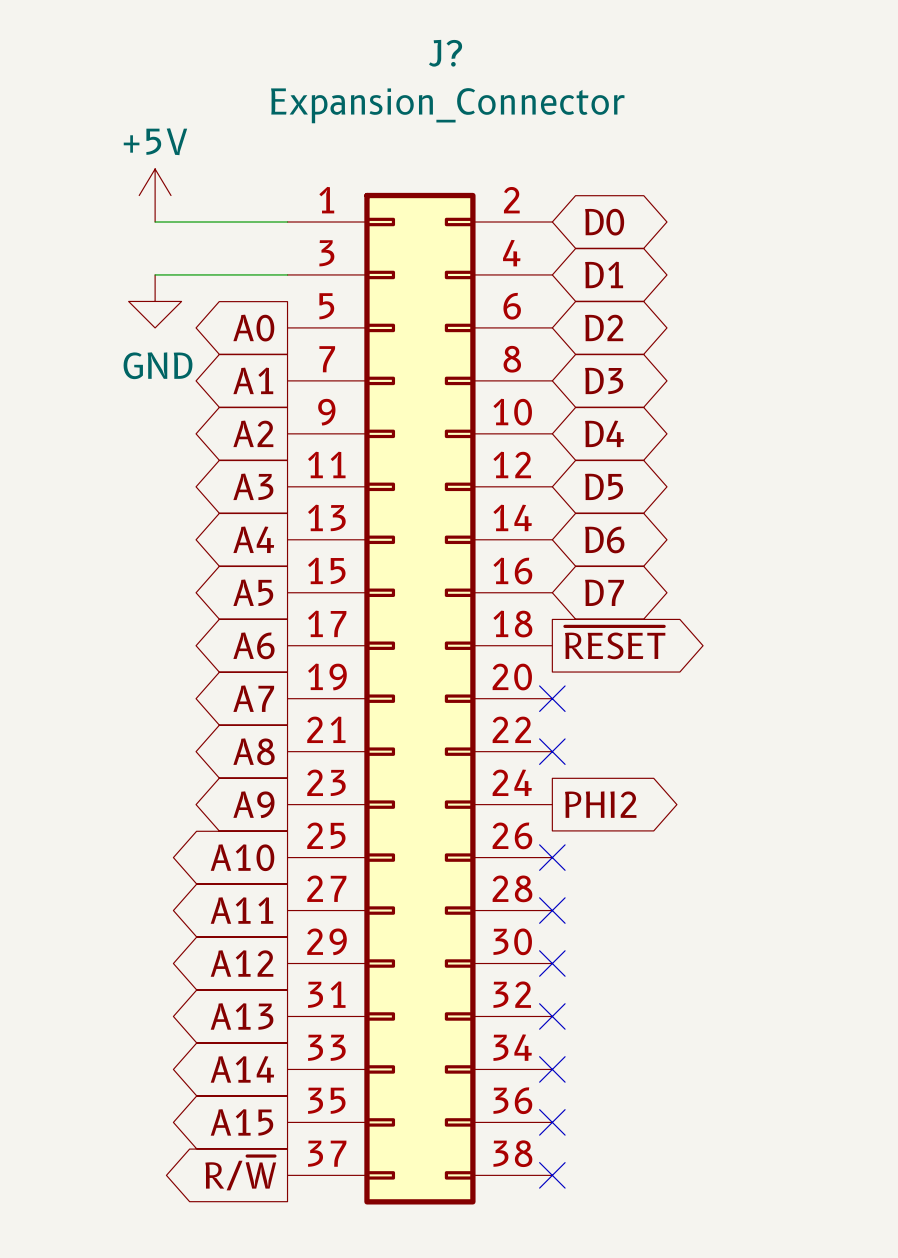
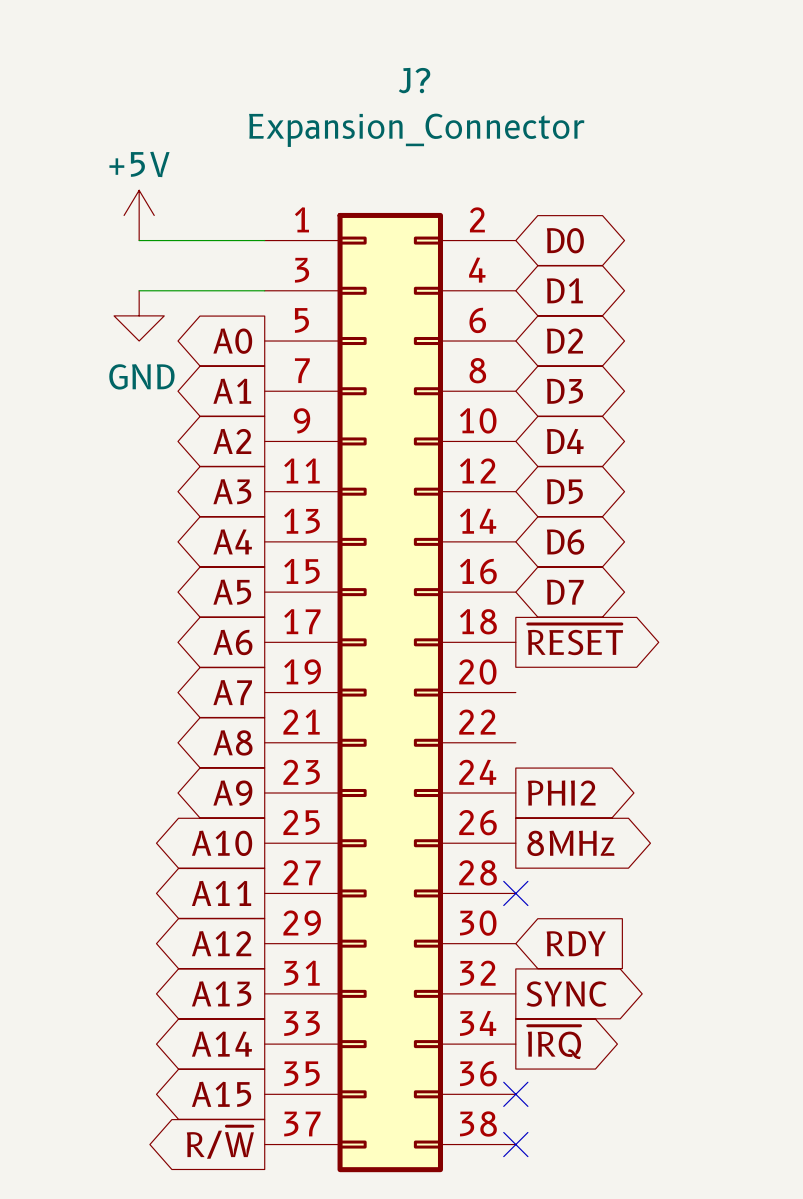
no-connect mark: (552, 698) -> none
no-connect mark: (552, 751) -> none
no-connect mark: (552, 857) -> none
global label: none -> 8MHz (570, 843)
no-connect mark: (552, 963) -> none
global label: none -> RDY (576, 943)
no-connect mark: (552, 1016) -> none
global label: none -> SYNC (566, 994)
global label: none -> ~{IRQ} (554, 1042)
no-connect mark: (552, 1069) -> none

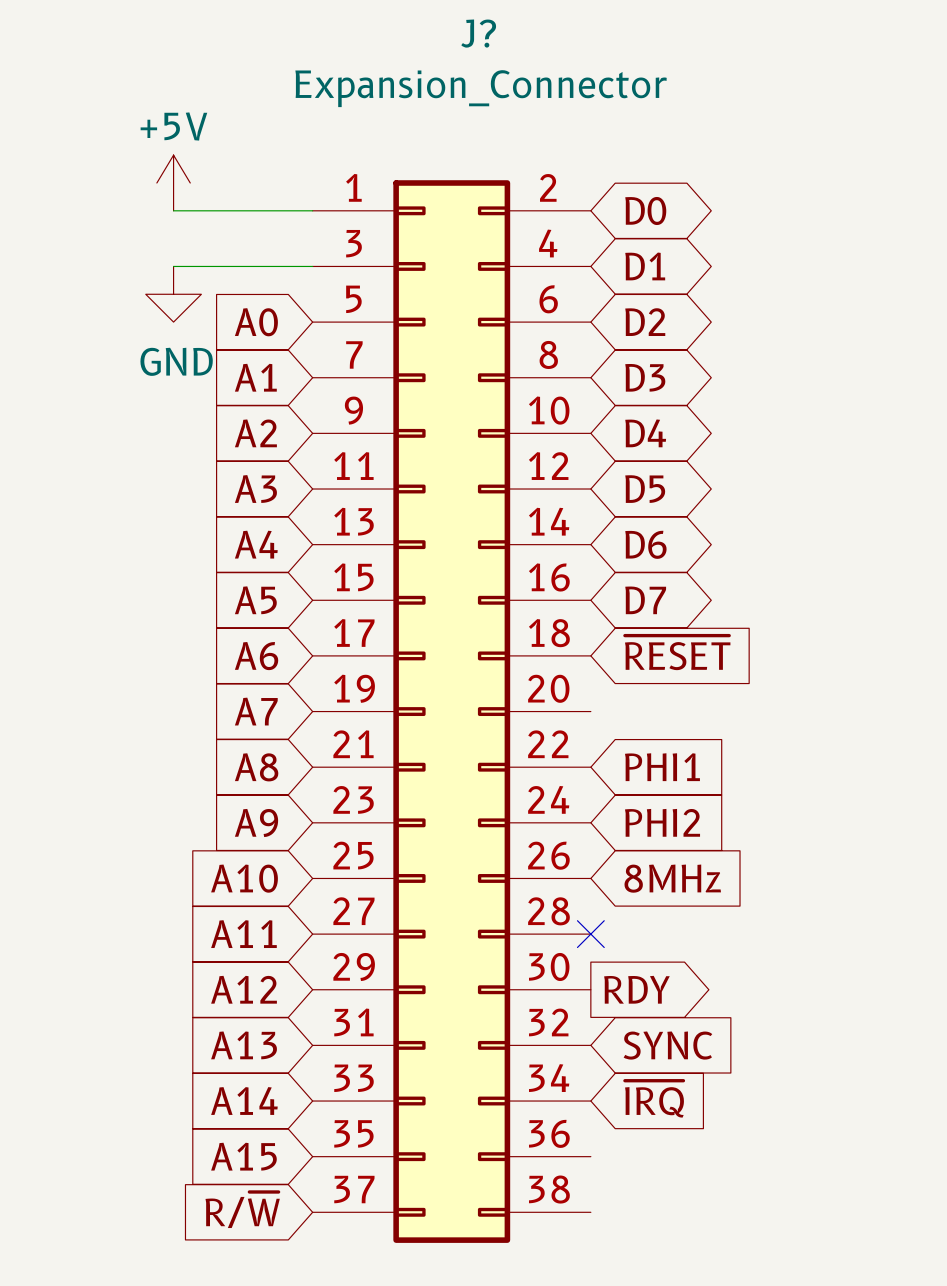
global label shape: output (232, 341) -> input (256, 322)
global label shape: output (232, 391) -> input (255, 377)
global label shape: output (232, 441) -> input (255, 433)
global label shape: output (232, 491) -> input (255, 489)
global label shape: output (232, 541) -> input (256, 544)
global label shape: output (232, 592) -> input (255, 600)
global label shape: output (575, 639) -> input (677, 652)
global label shape: output (232, 642) -> input (256, 656)
global label shape: output (232, 692) -> input (256, 711)
global label shape: output (232, 742) -> input (256, 767)
global label: none -> PHI1 (662, 767)
global label shape: output (232, 793) -> input (256, 822)
global label shape: output (561, 793) -> input (662, 822)
global label shape: output (222, 843) -> input (244, 878)
global label shape: output (570, 843) -> input (672, 878)
global label shape: output (221, 893) -> input (243, 934)
global label shape: output (221, 943) -> input (244, 989)
global label shape: input (576, 943) -> output (636, 989)
global label shape: output (221, 993) -> input (244, 1045)
global label shape: output (566, 994) -> input (667, 1045)
global label shape: output (554, 1042) -> input (654, 1099)
global label shape: output (221, 1044) -> input (244, 1101)
global label shape: output (221, 1094) -> input (243, 1156)
no-connect mark: (515, 1094) -> none
global label shape: output (220, 1142) -> input (242, 1210)
no-connect mark: (515, 1144) -> none

